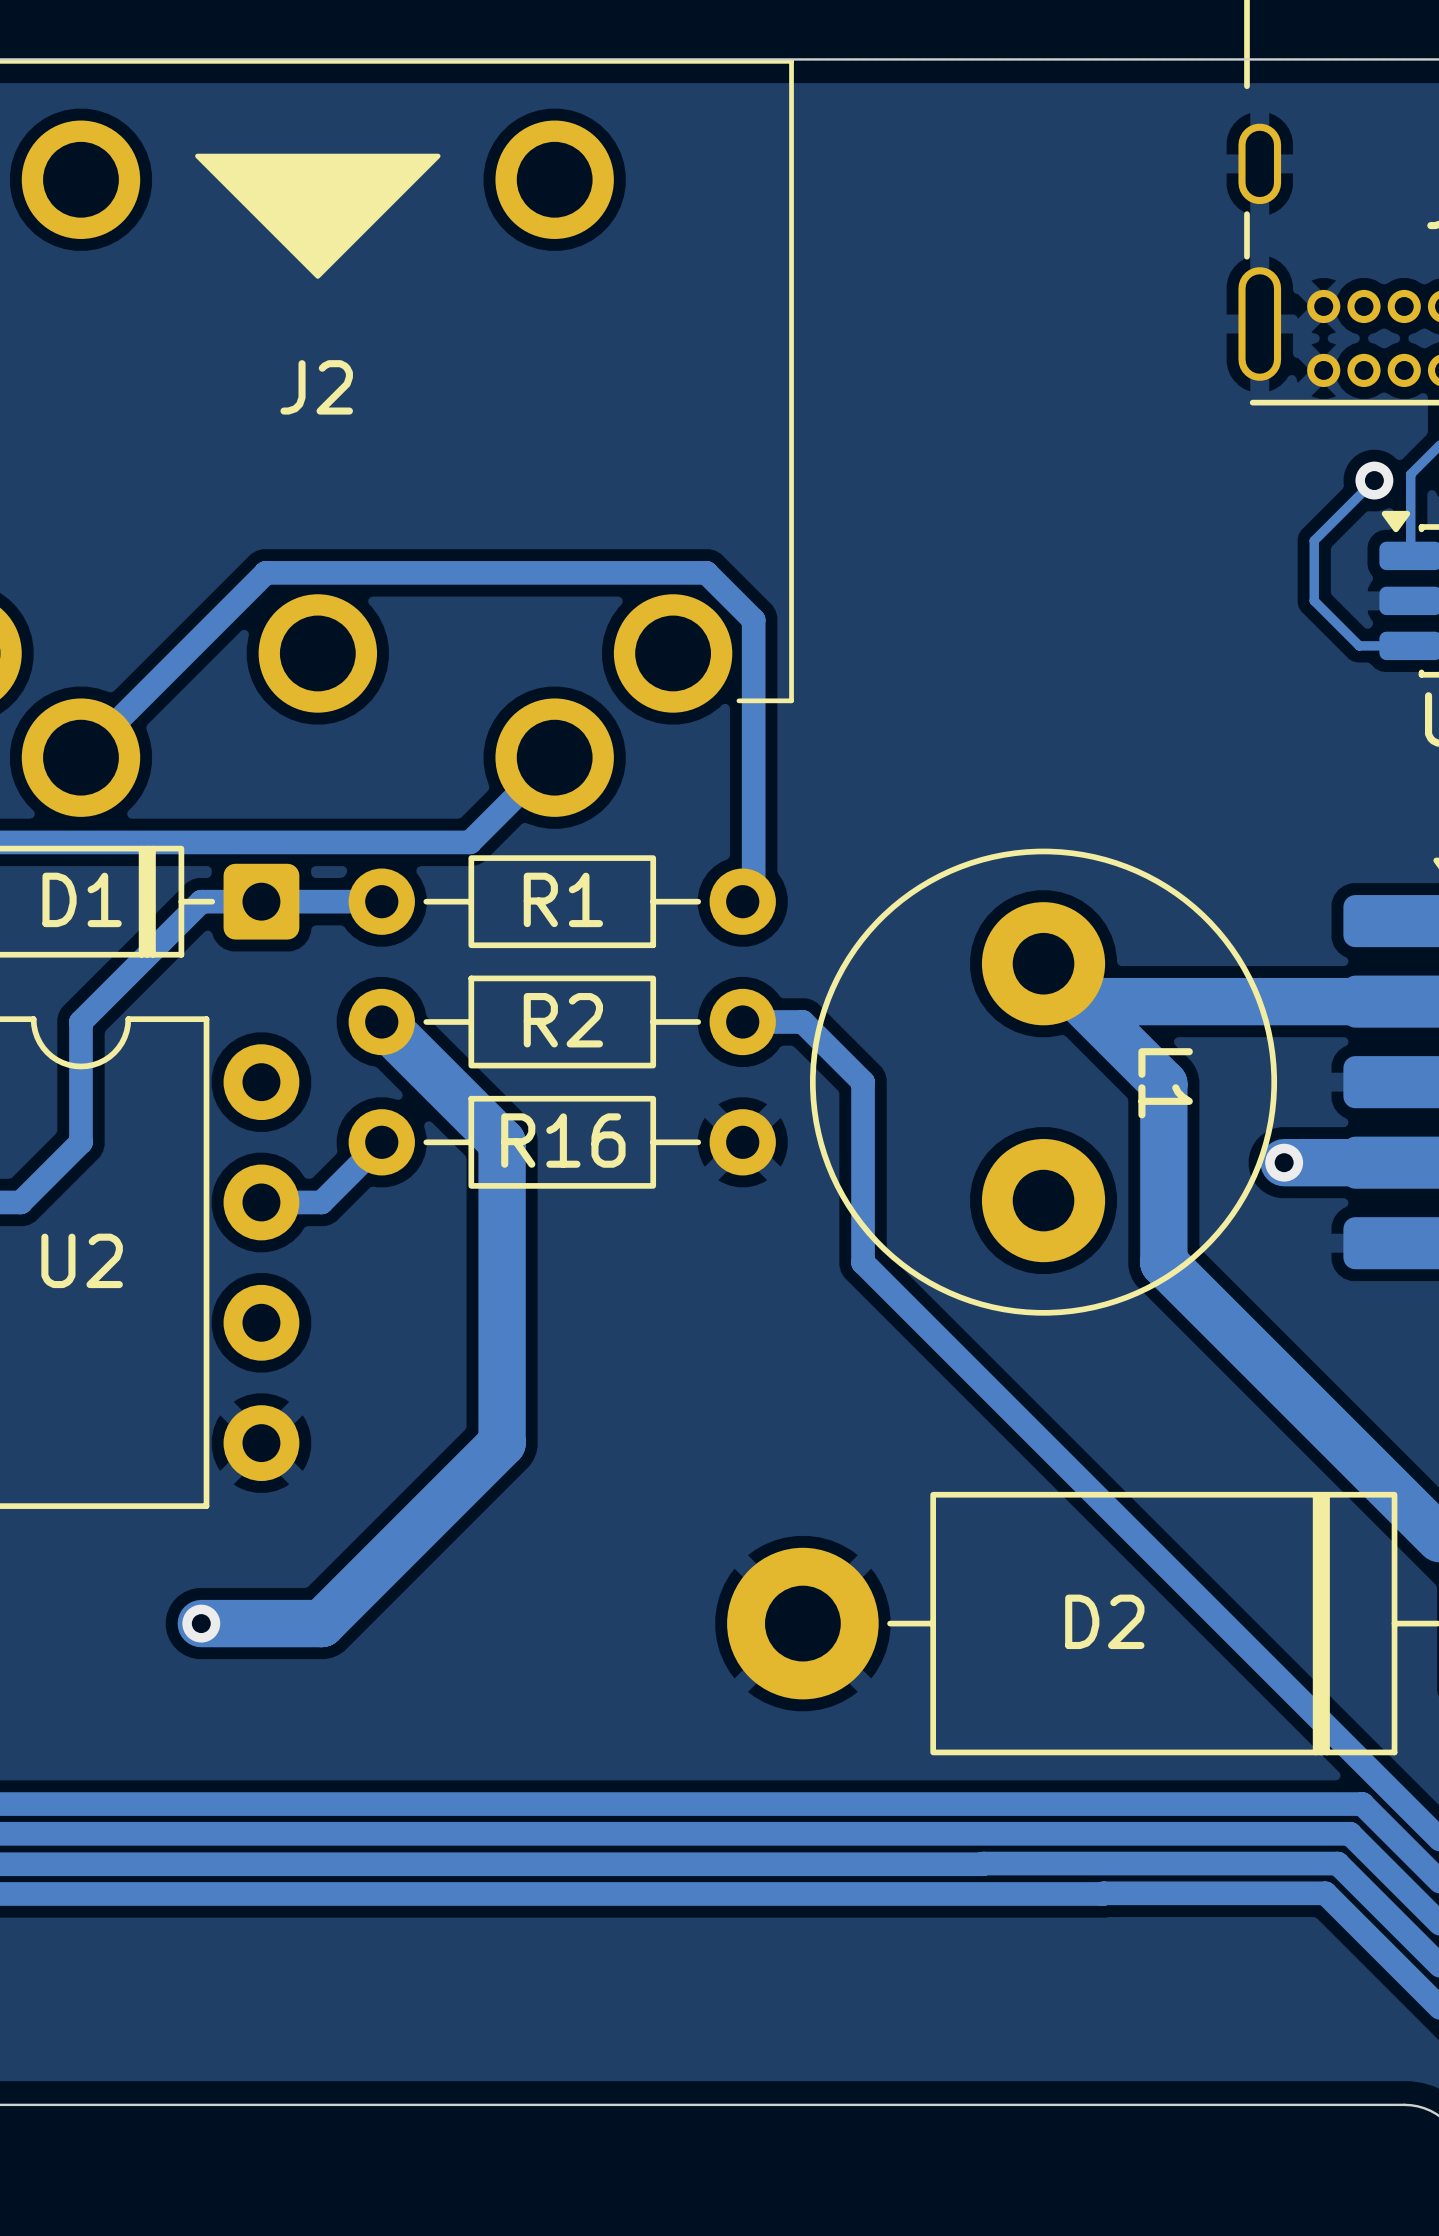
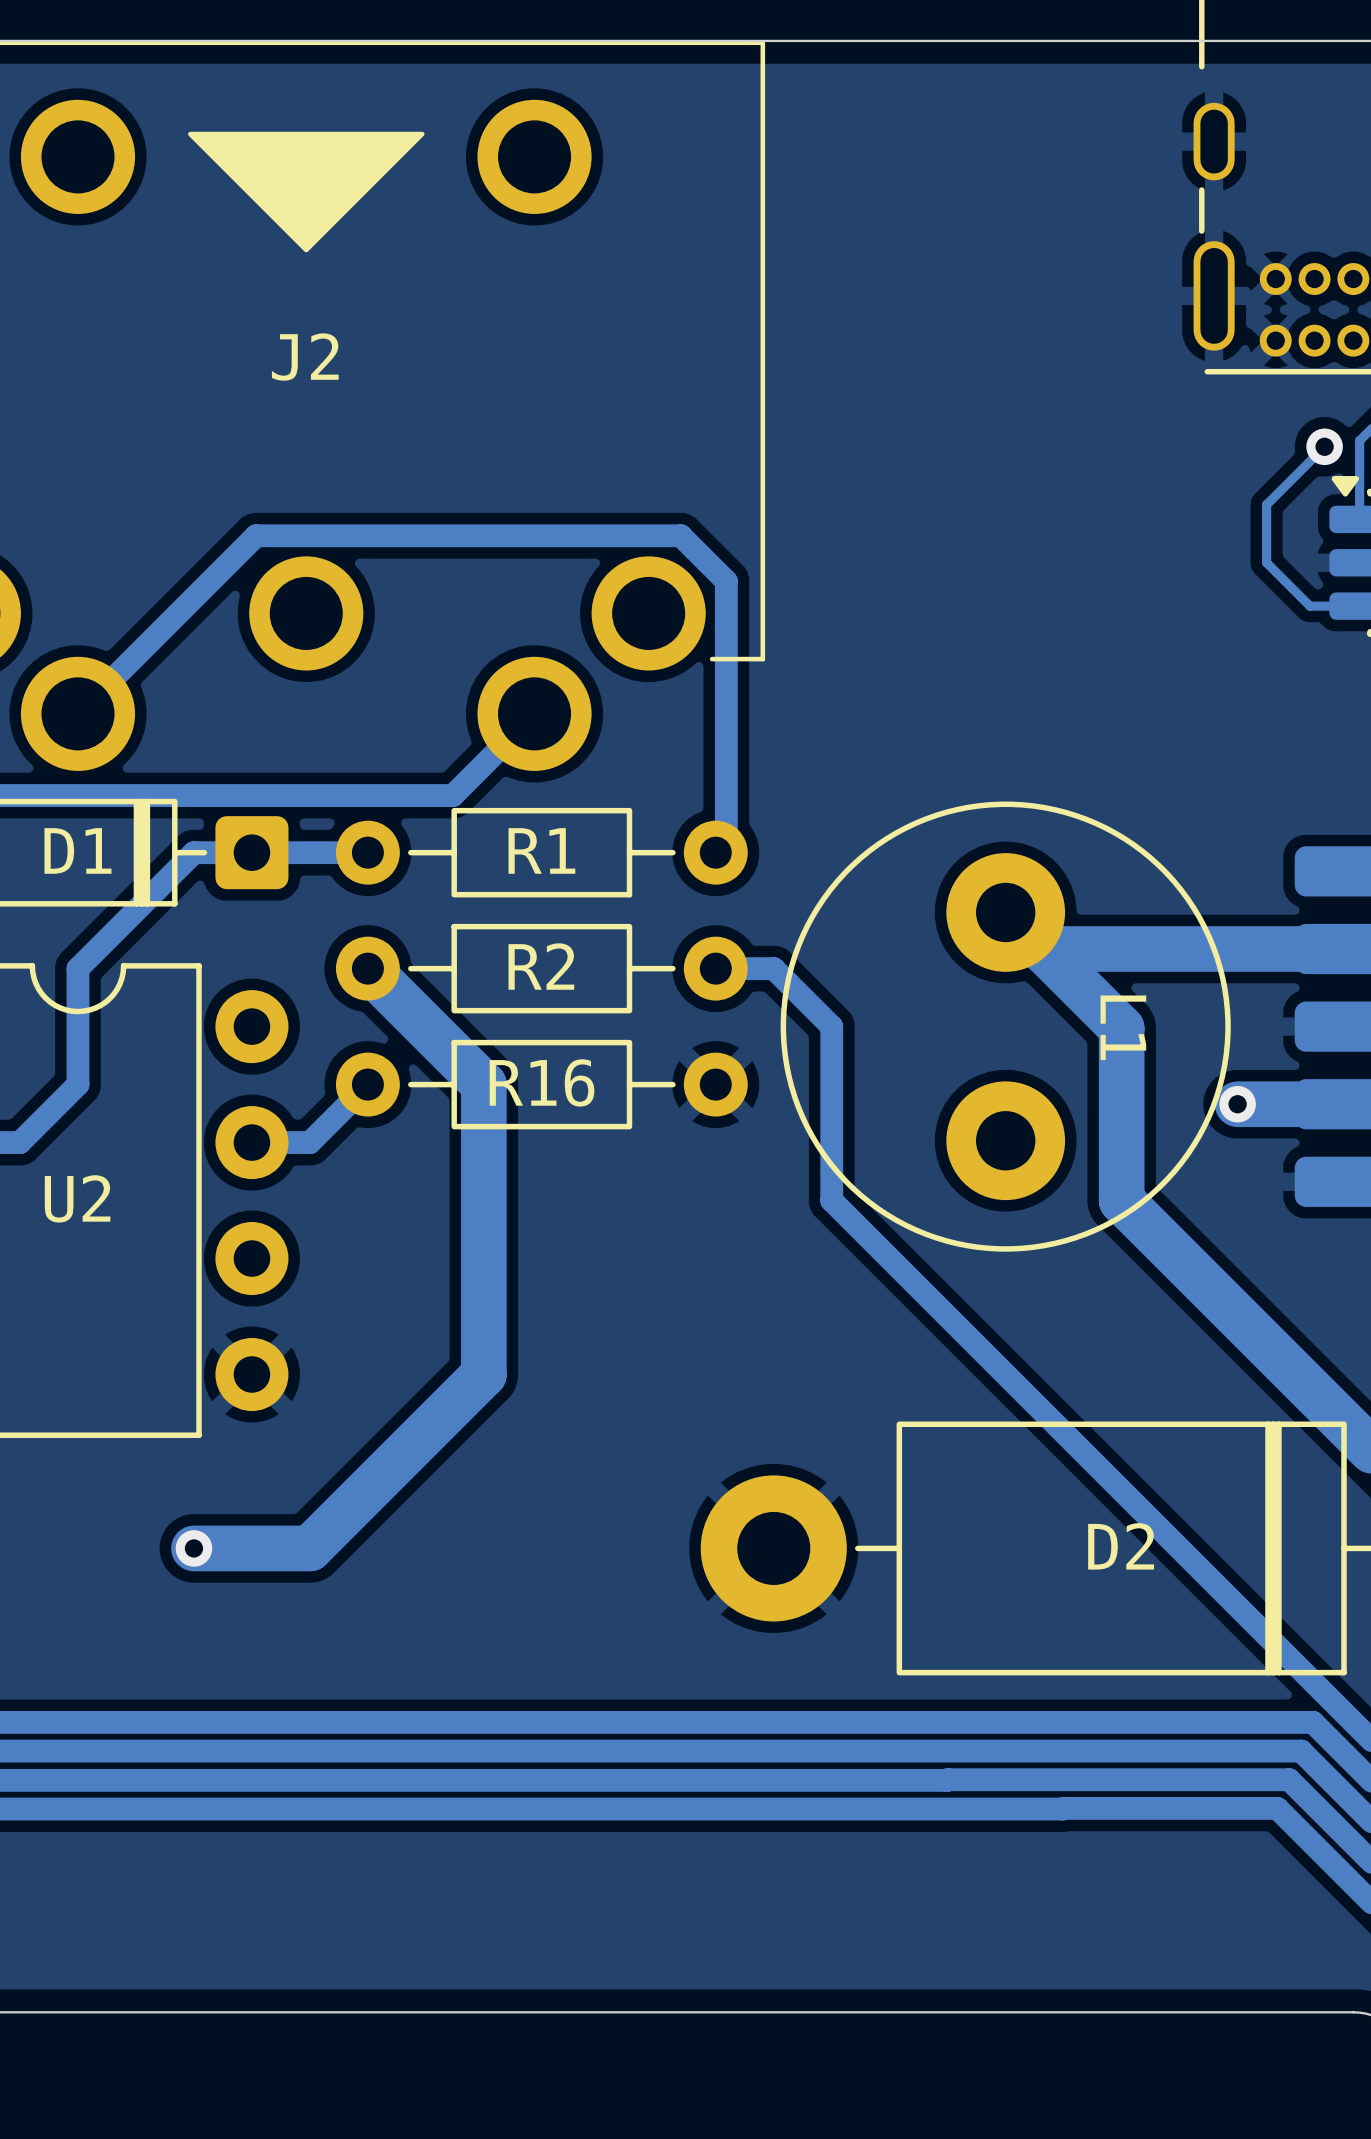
D2 name position: D2 (1104, 1621) -> D2 (1121, 1546)

